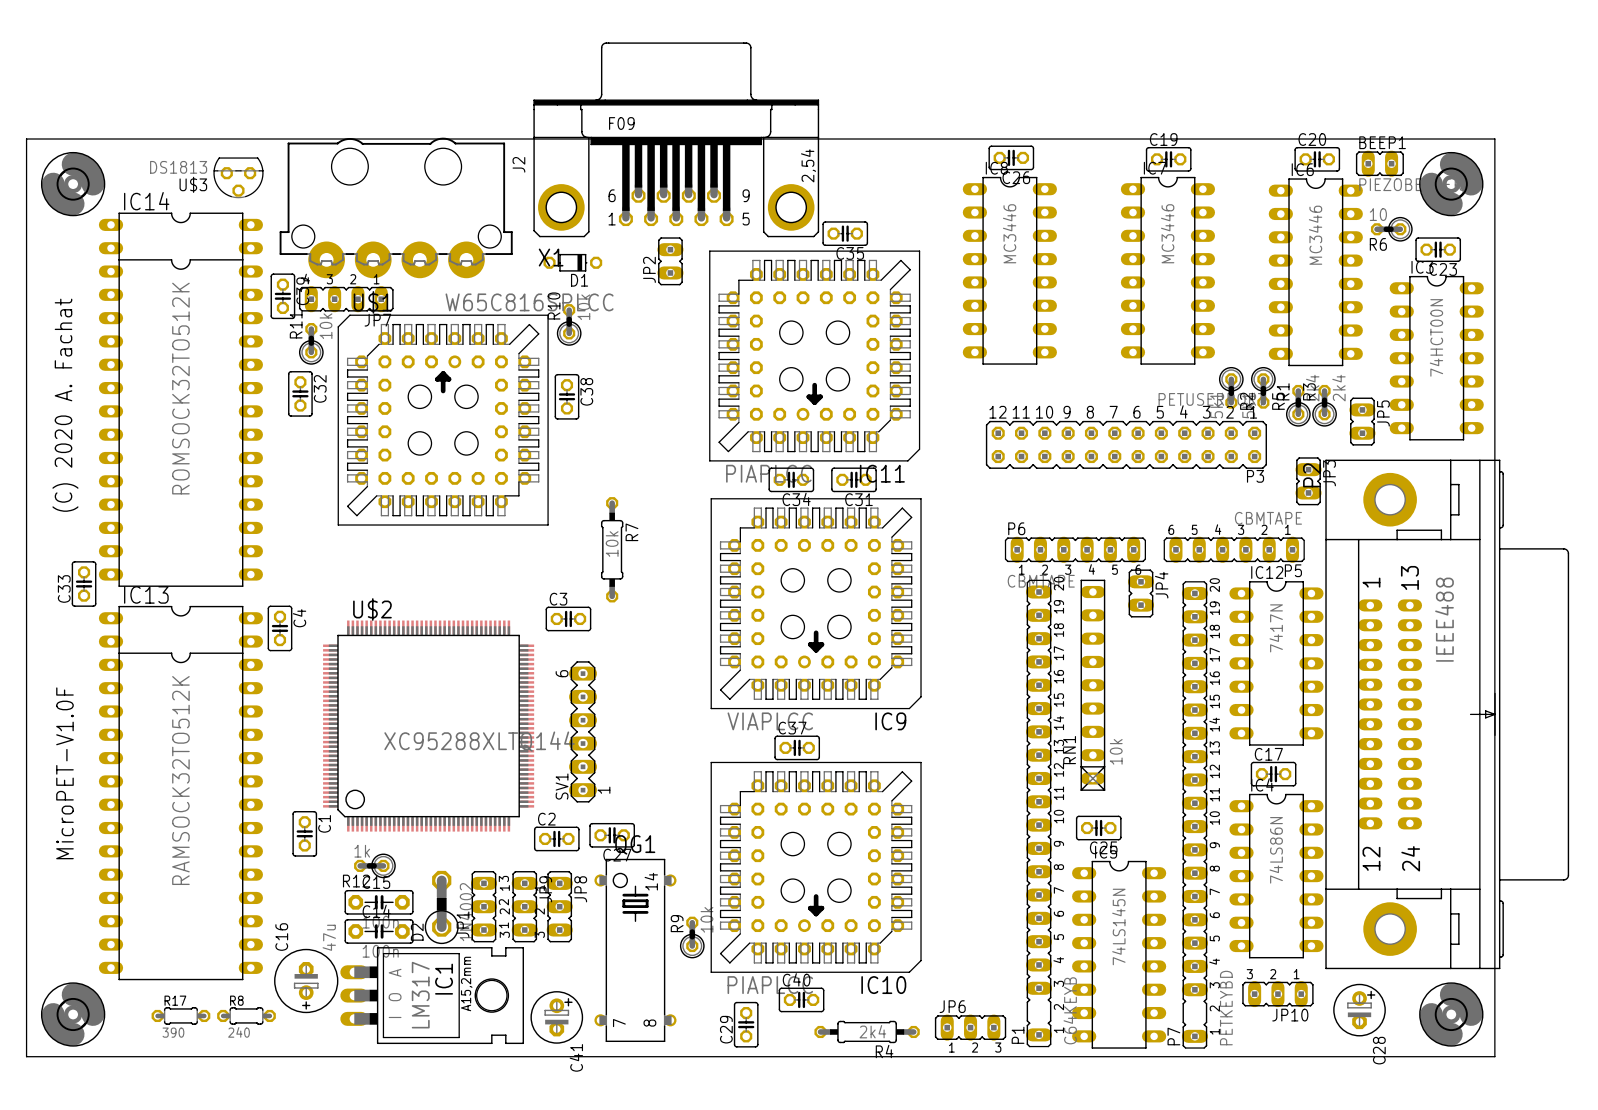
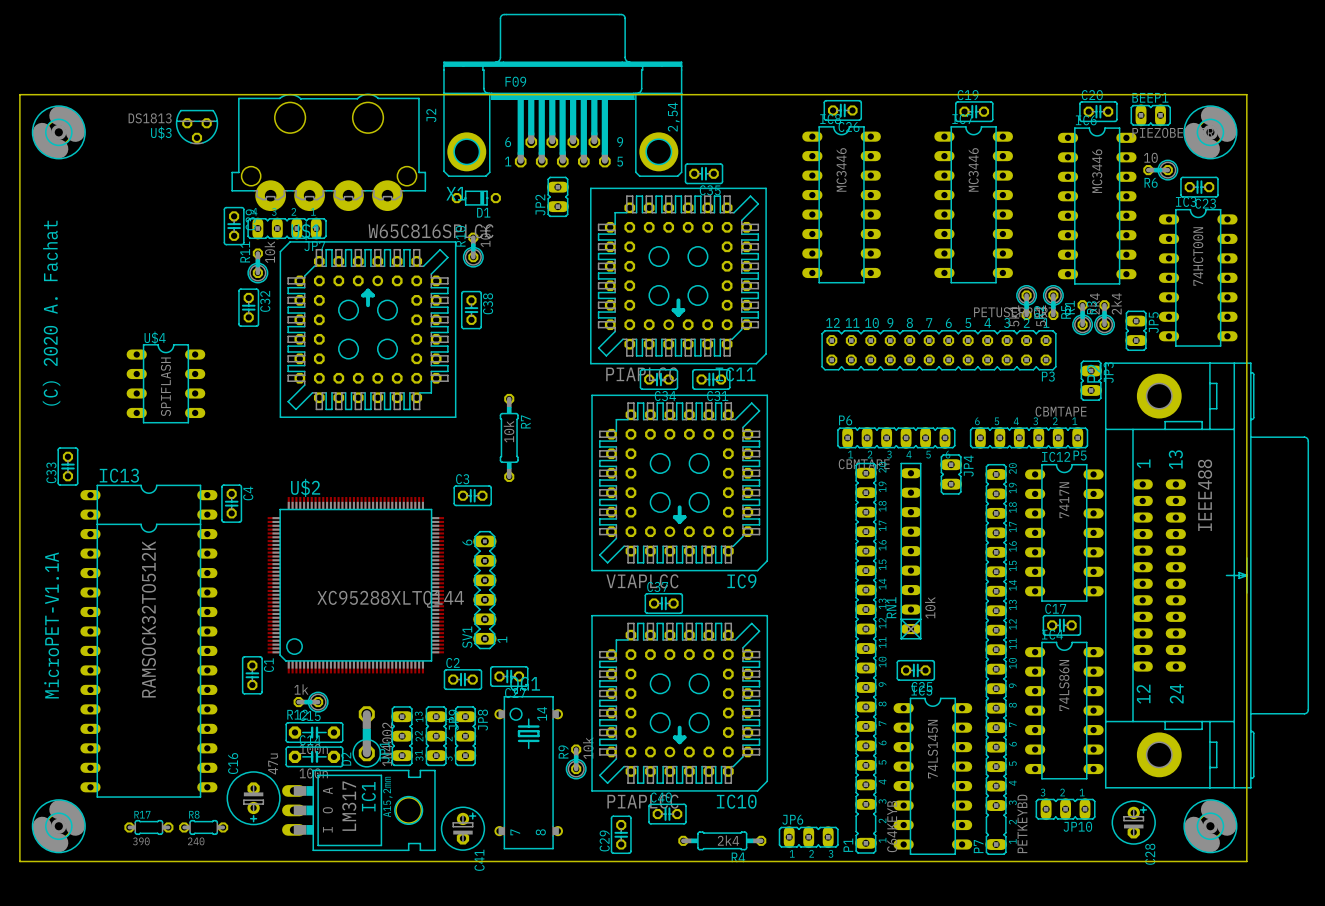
IC14: ROMSOCK32TO512K (180, 399) -> none
U$4: none -> SPIFLASH (165, 383)
text: MicroPET-V1.0F (64, 773) -> MicroPET-V1.1A (51, 625)

